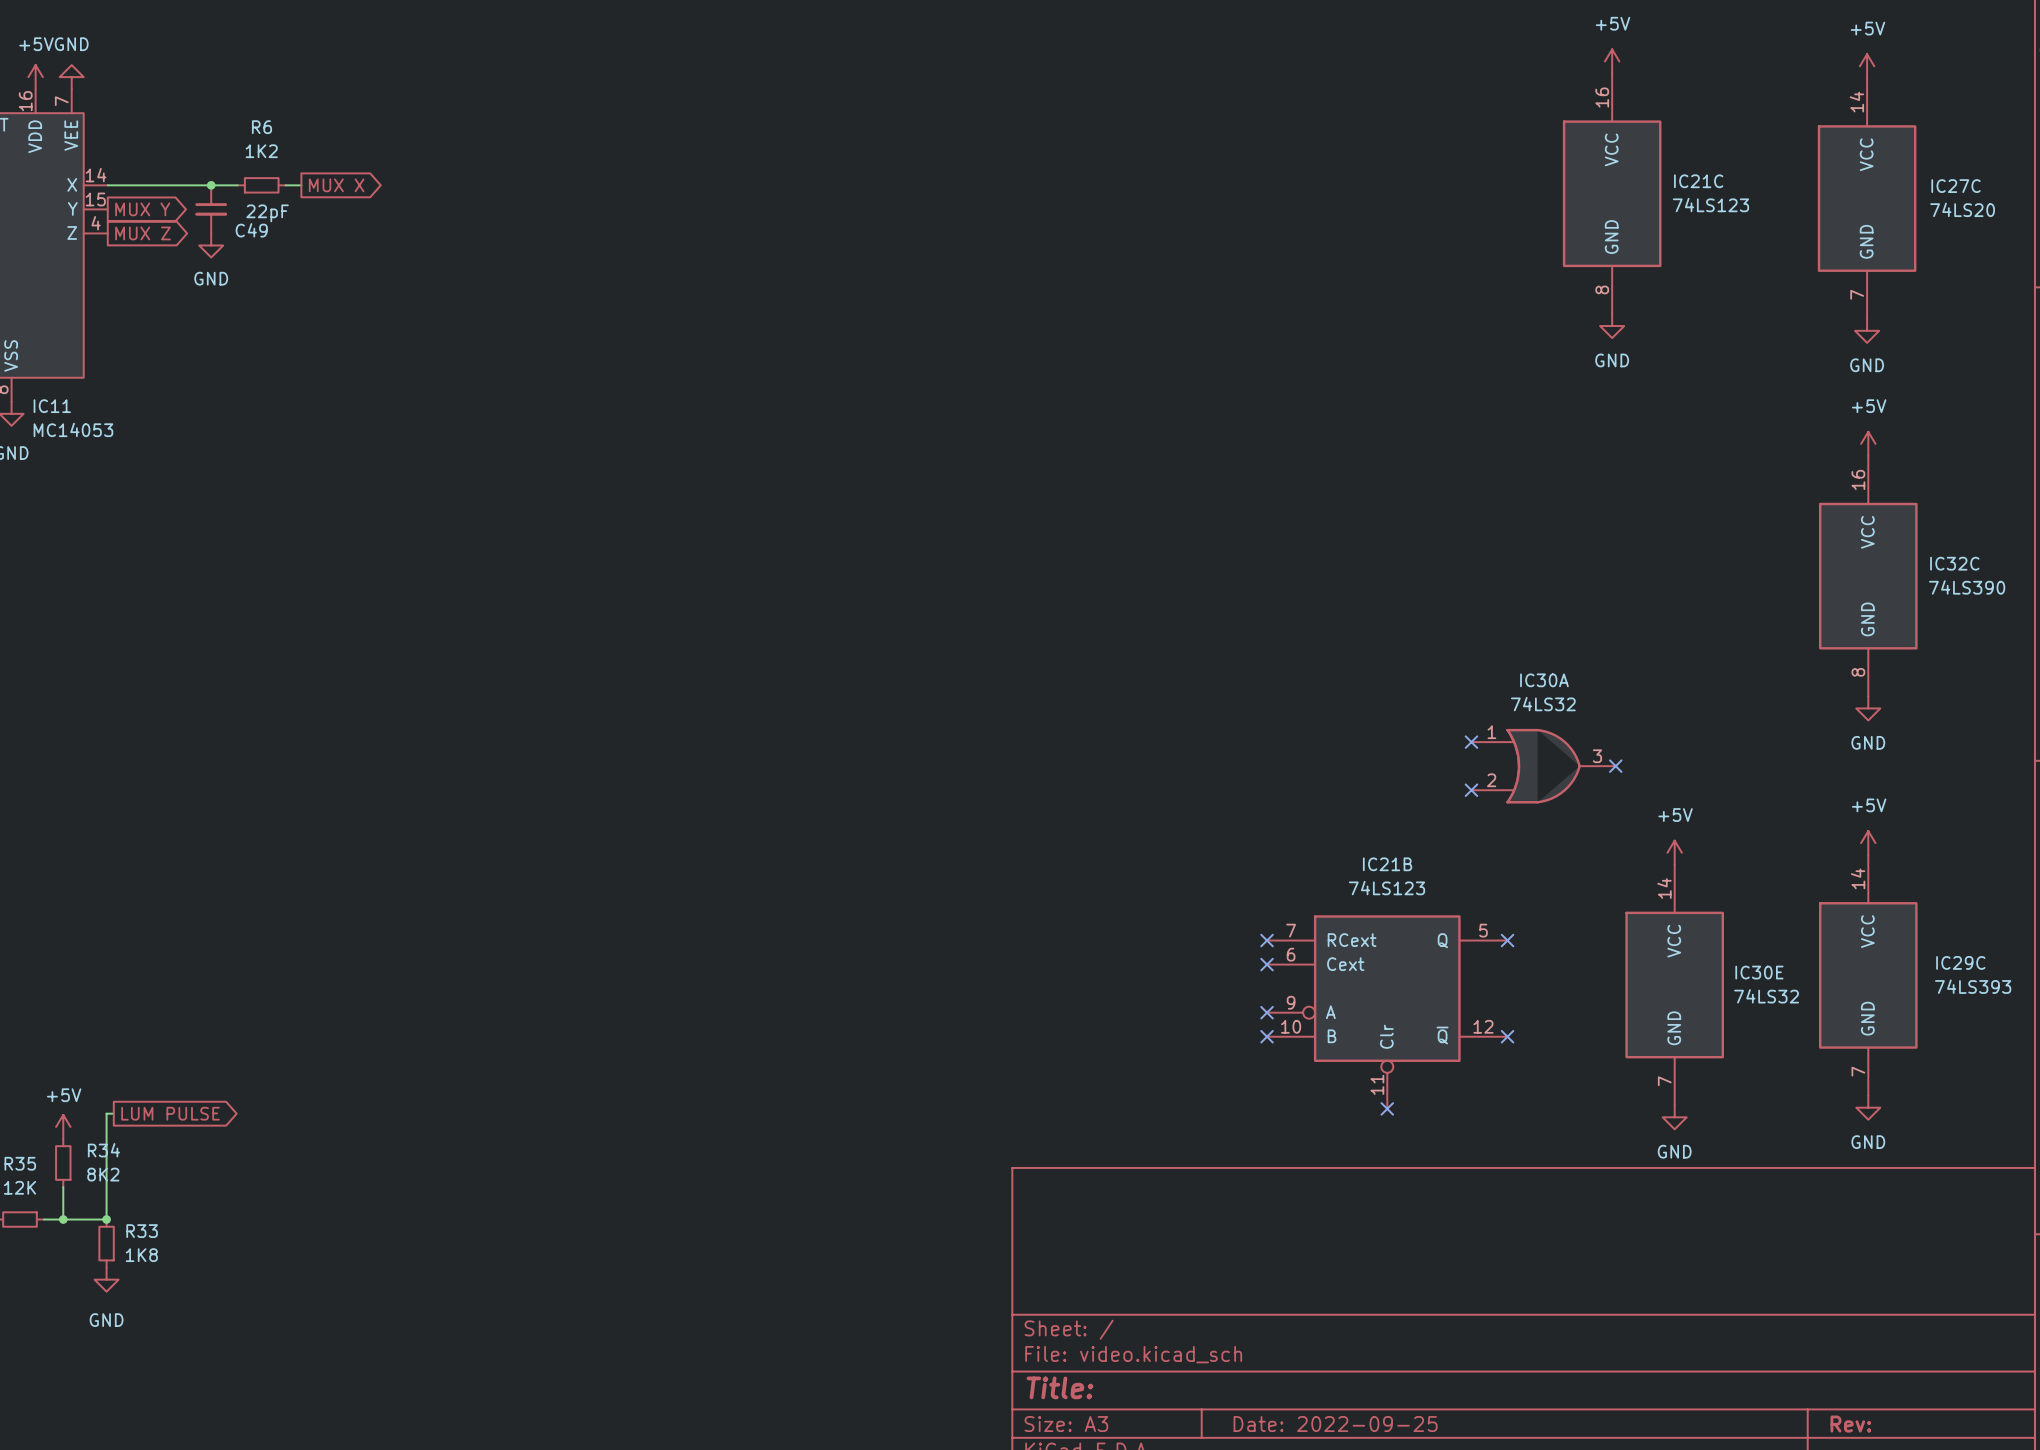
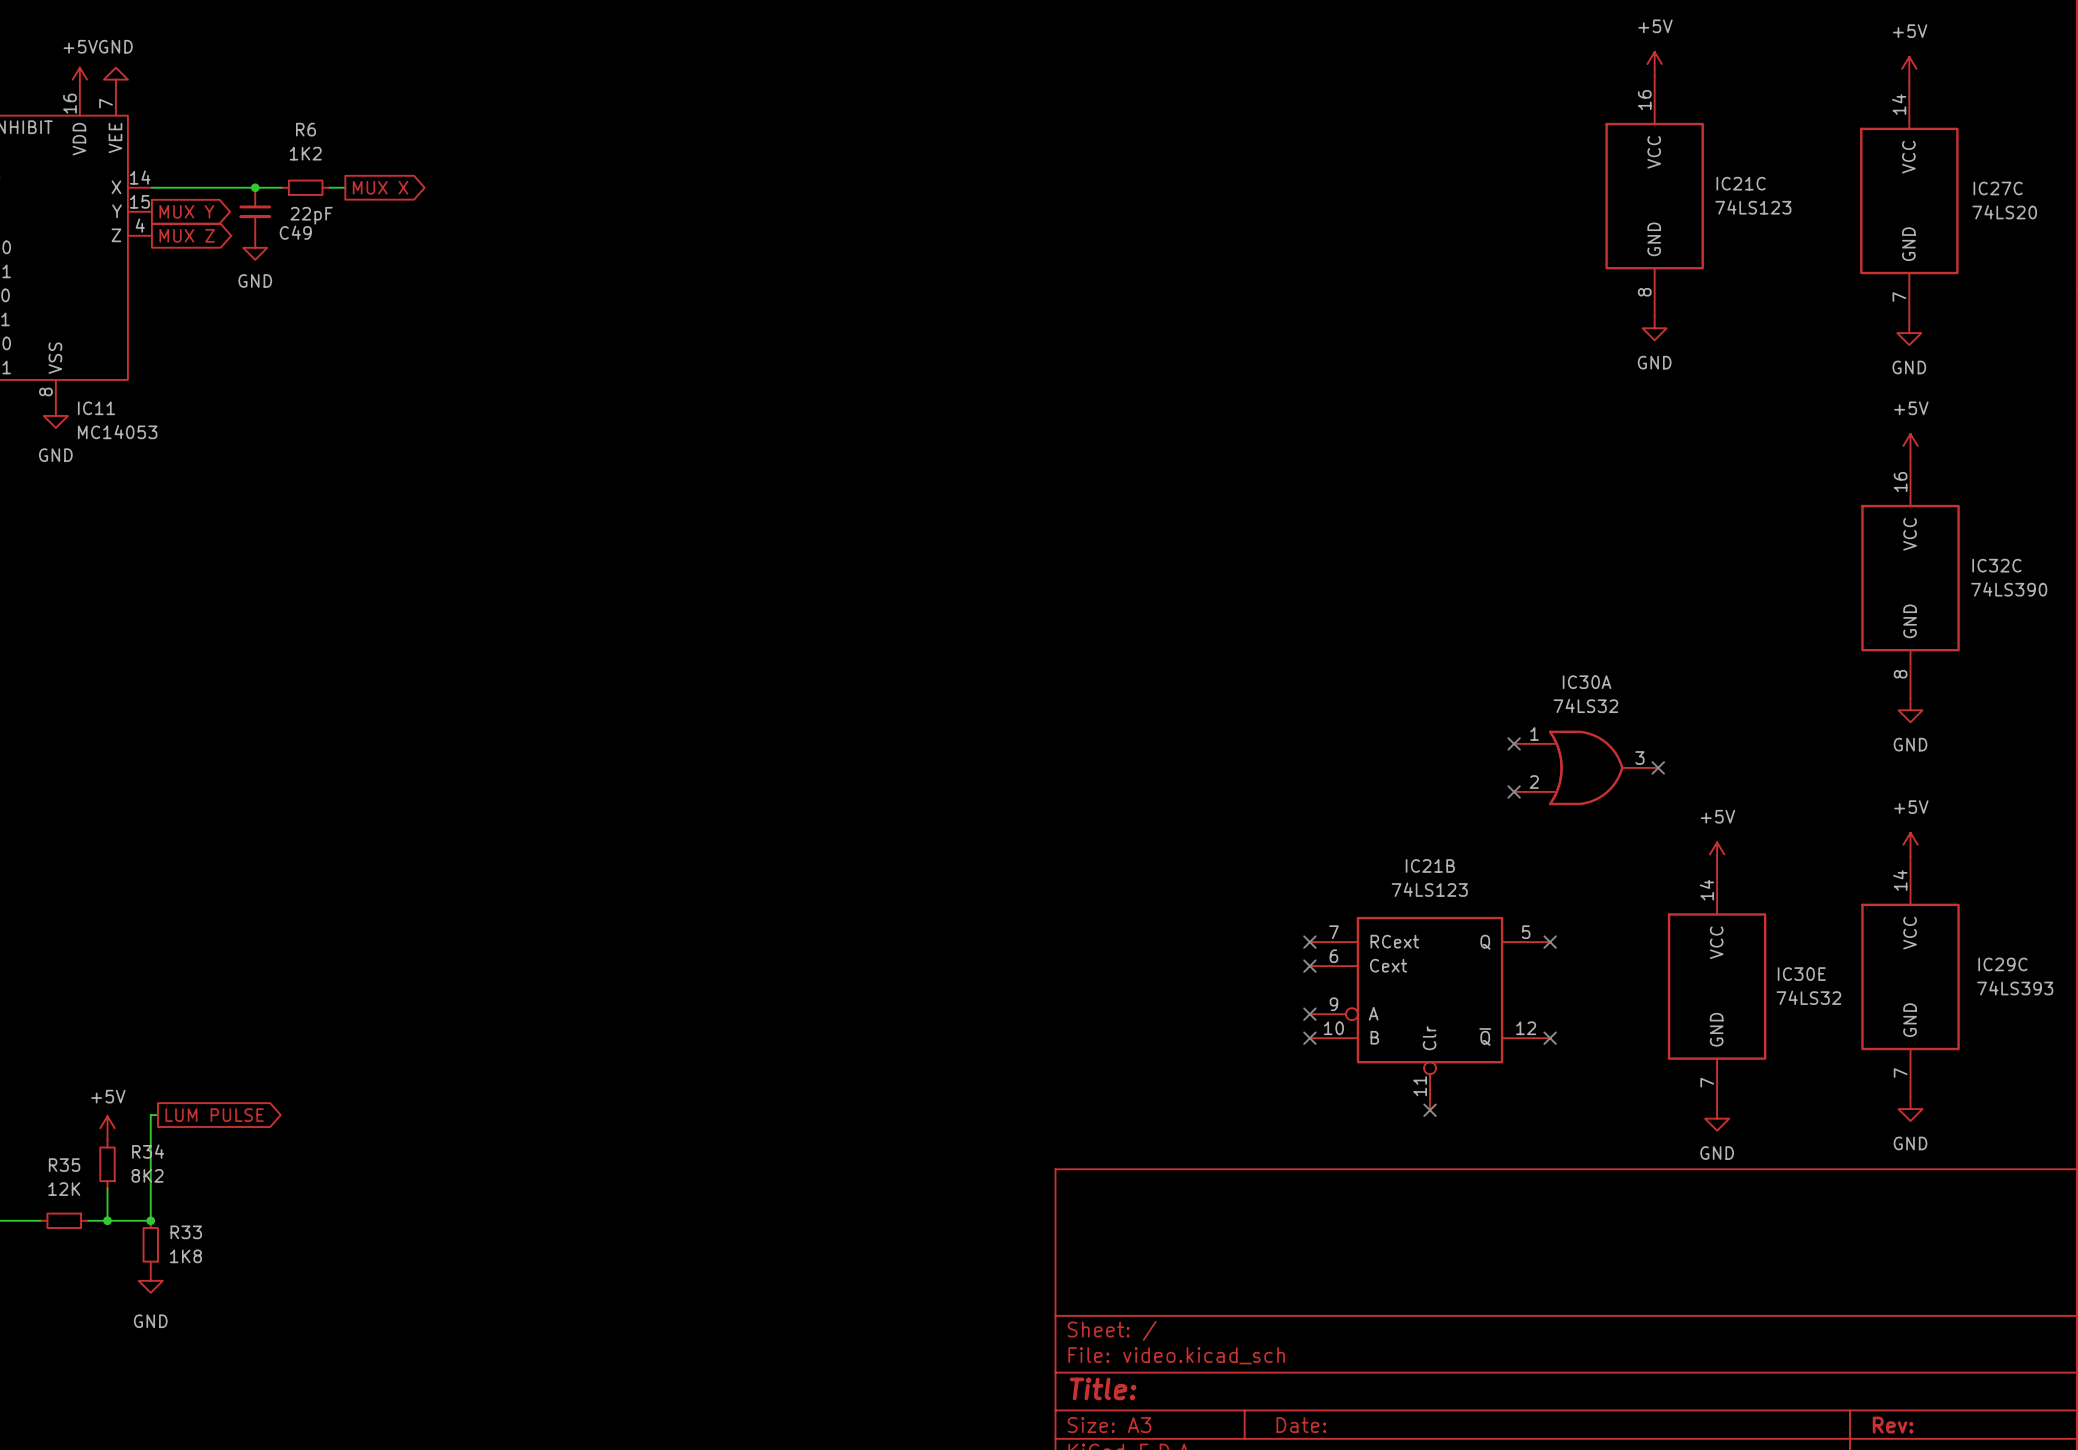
title block: Date: 2022-09-25 (1335, 1424) -> Date: (1301, 1425)

